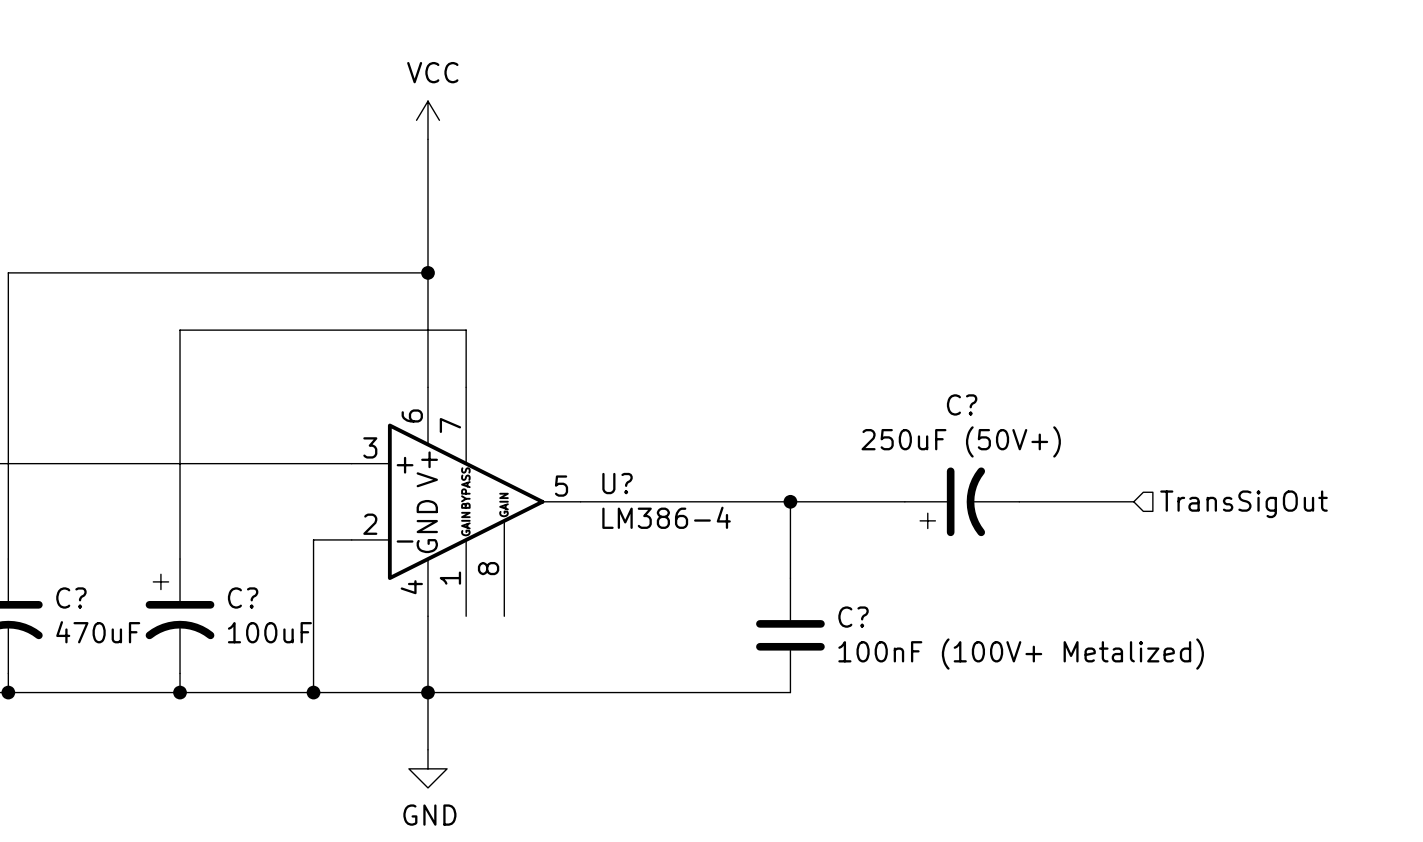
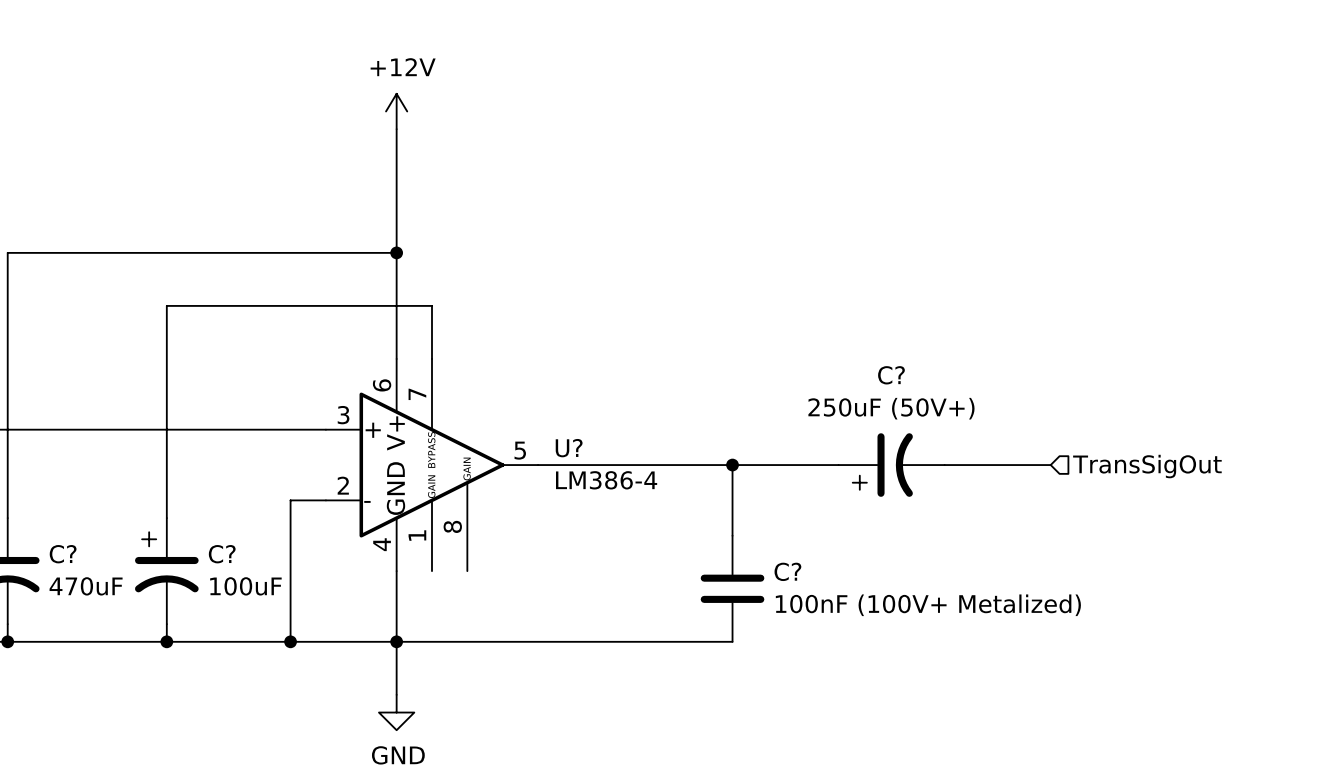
power symbol: VCC (427, 120) -> +12V (396, 111)

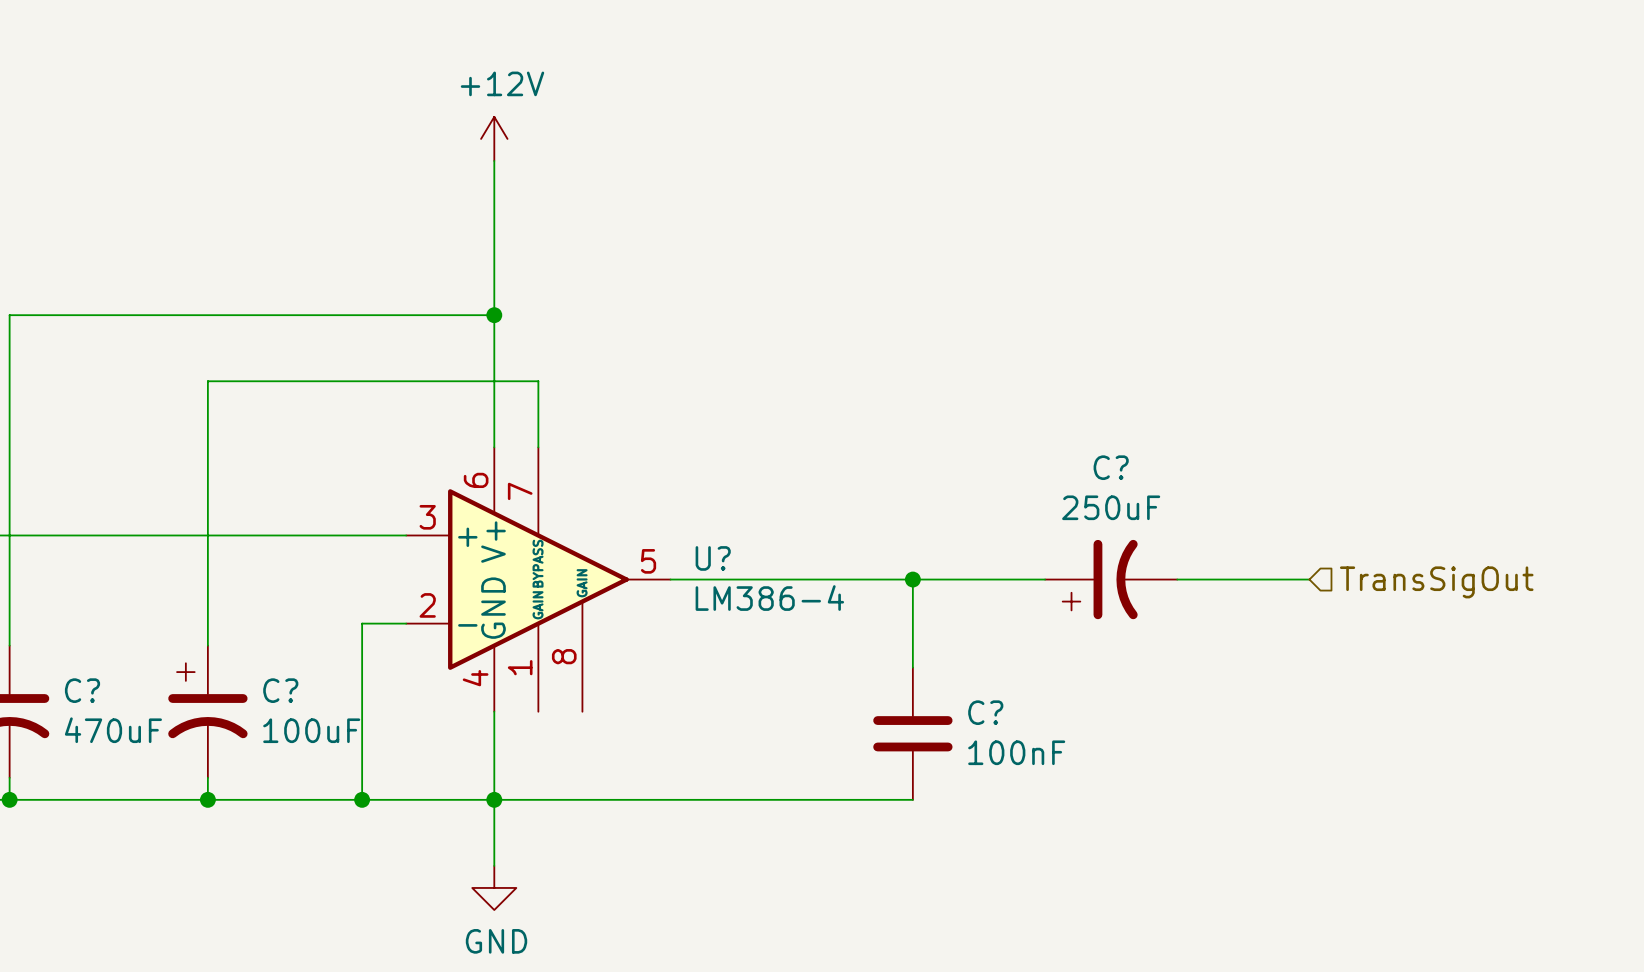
C? value: 250uF (50V+) (891, 408) -> 250uF (1111, 507)
C? value: 100nF (100V+ Metalized) (928, 605) -> 100nF (1016, 752)

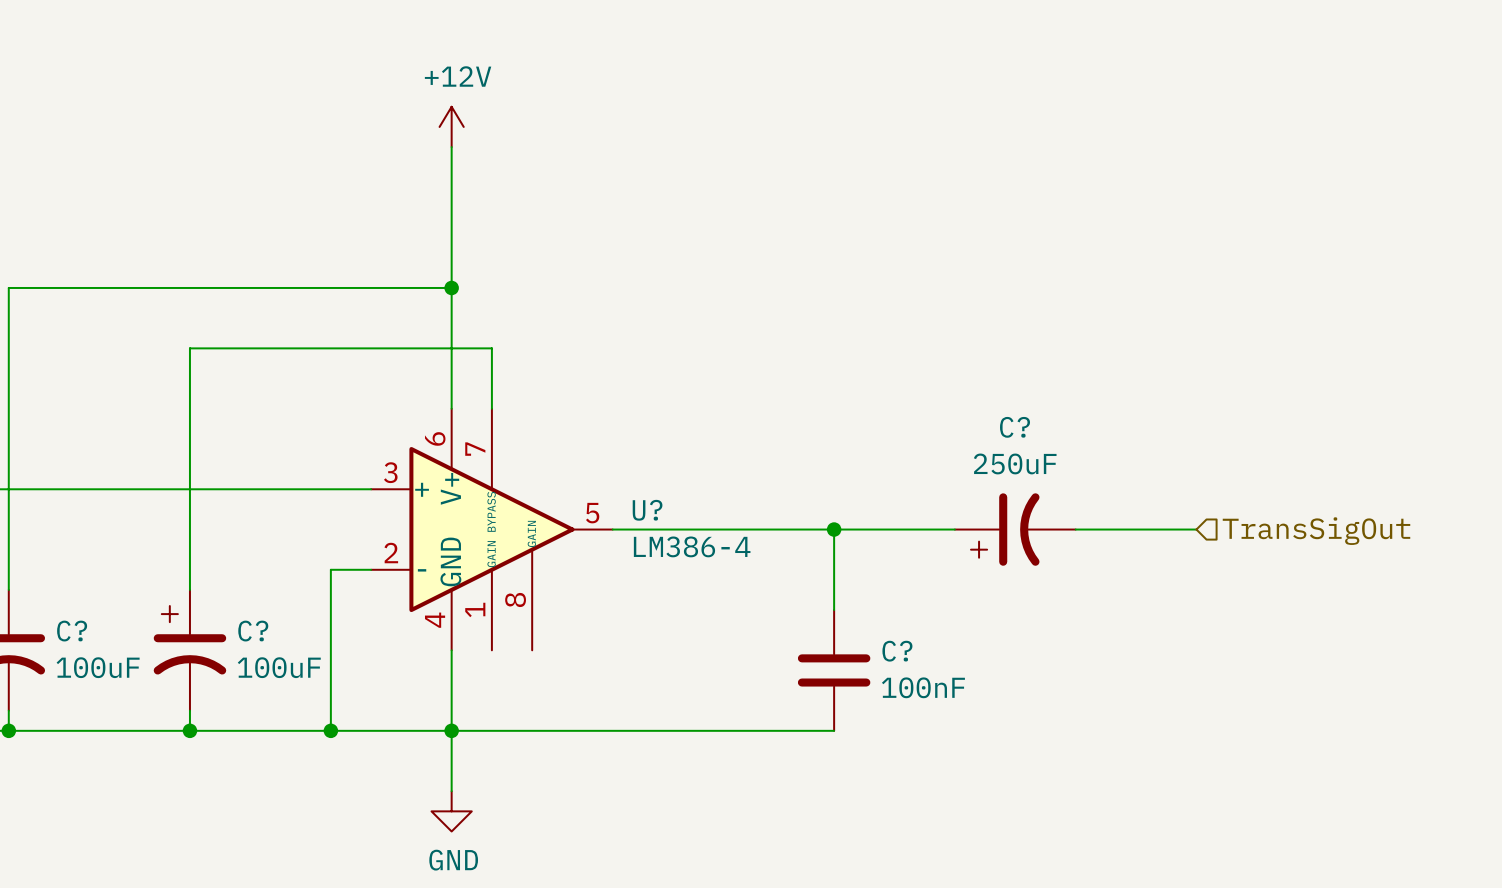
C? value: 470uF (113, 730) -> 100uF (98, 667)

